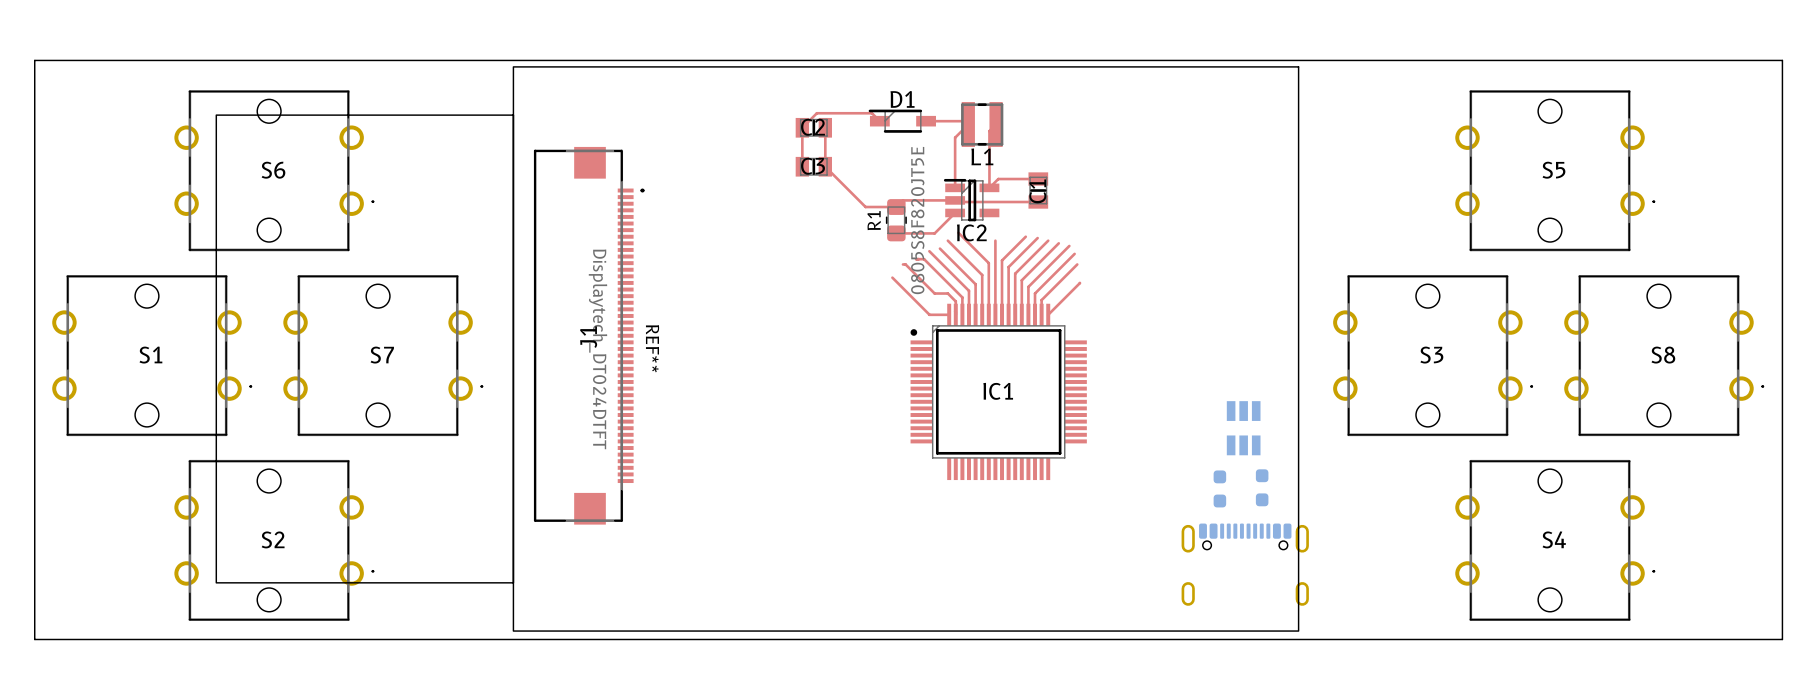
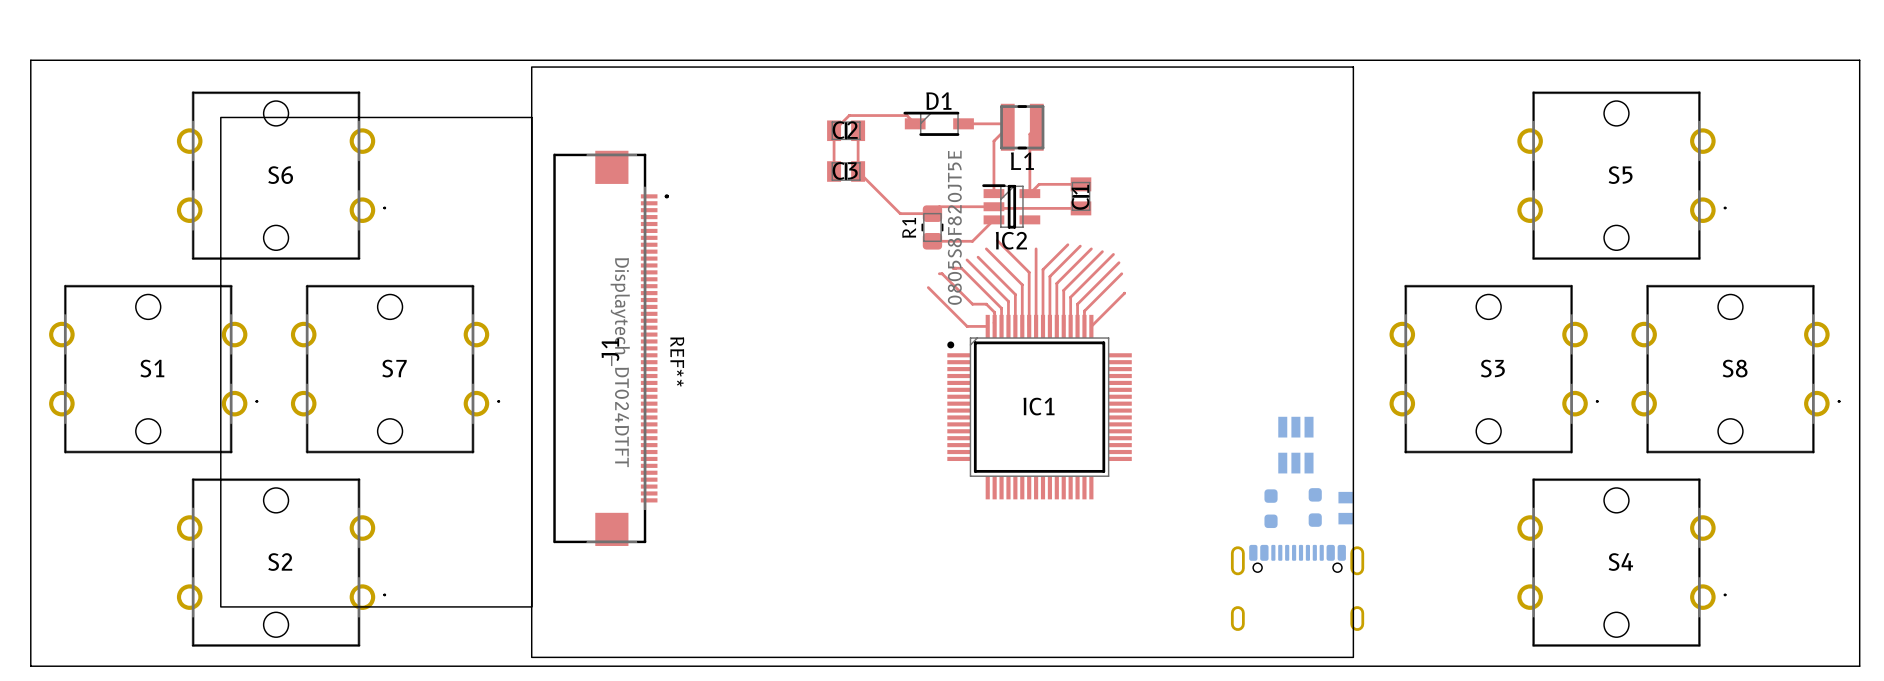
part: none -> (1345, 508)

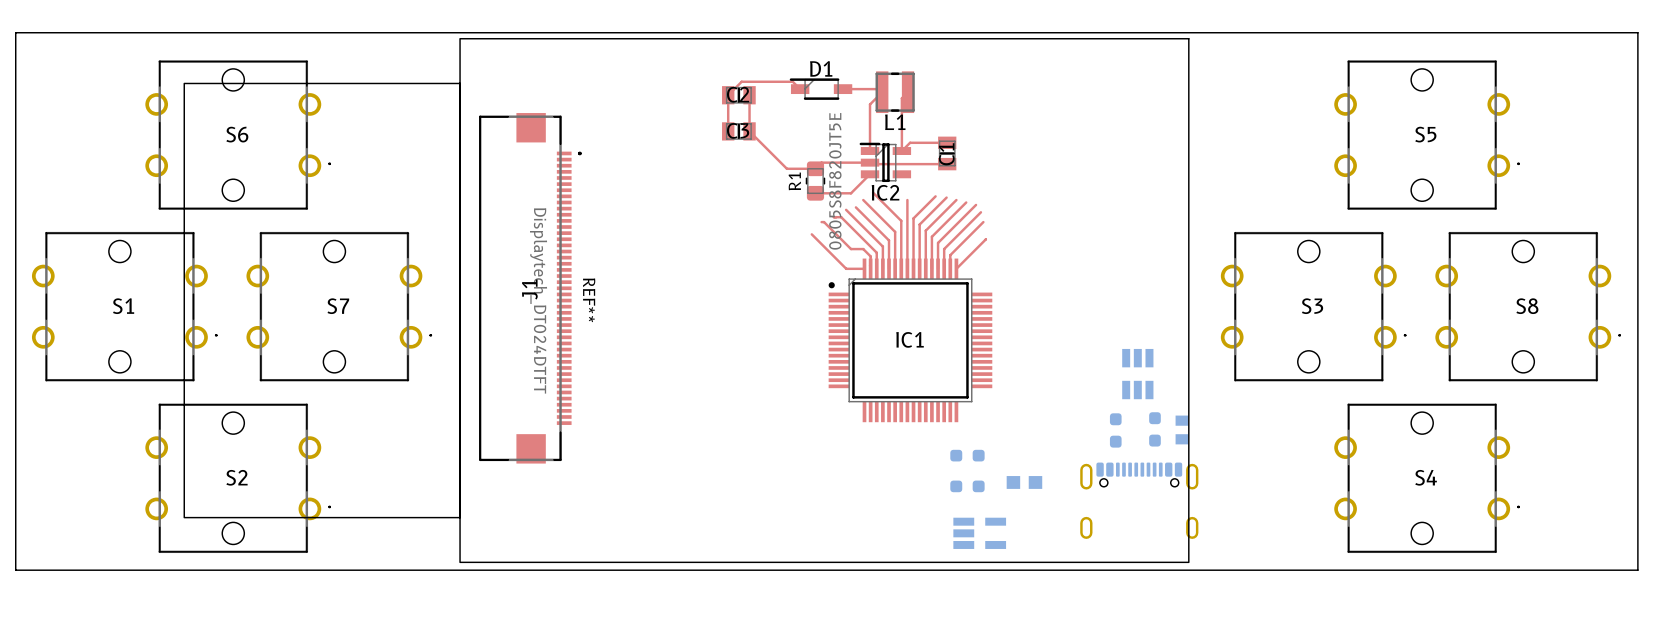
part: none -> (967, 455)
part: none -> (1024, 482)
part: none -> (967, 486)
part: none -> (979, 533)

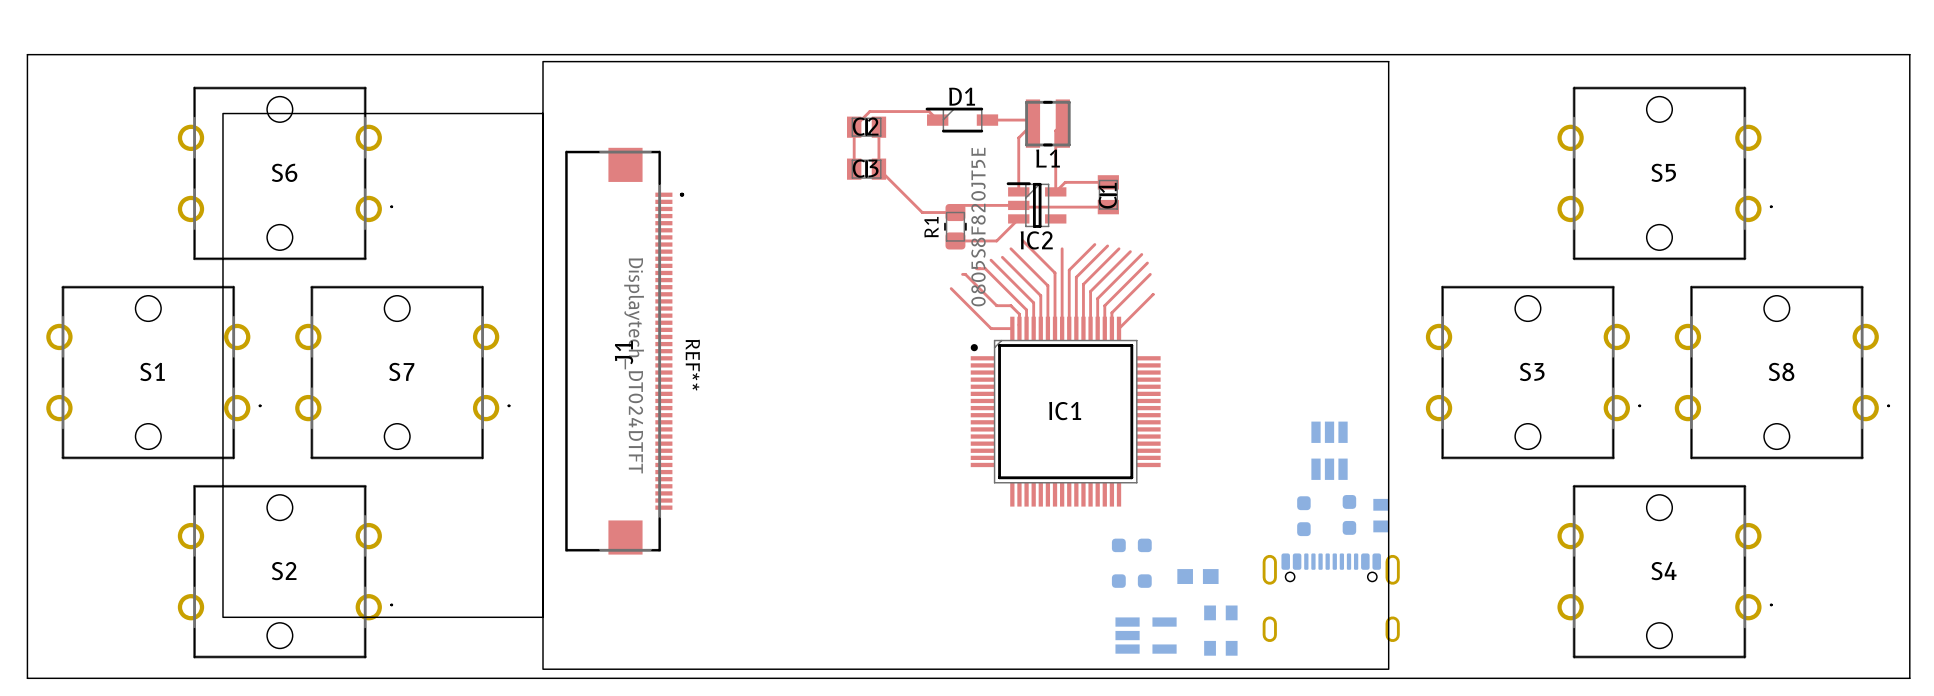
part: none -> (1220, 612)
part: none -> (1220, 648)

